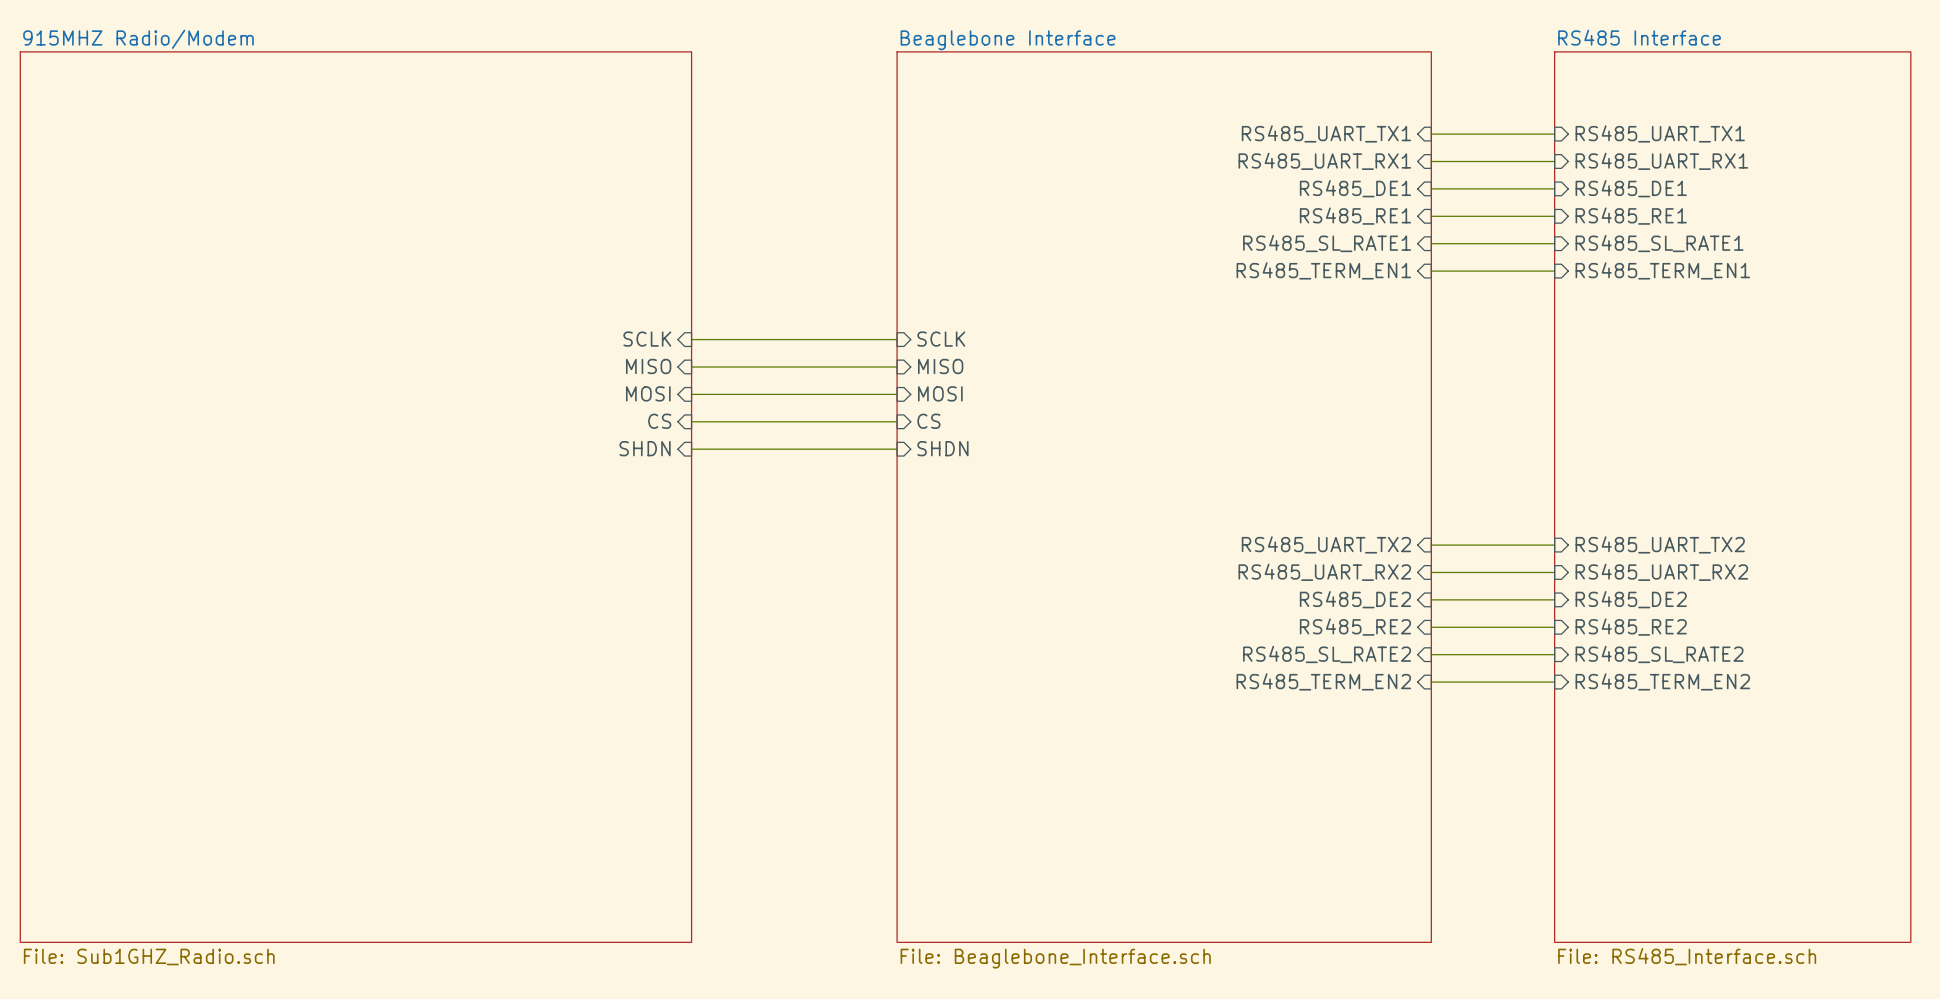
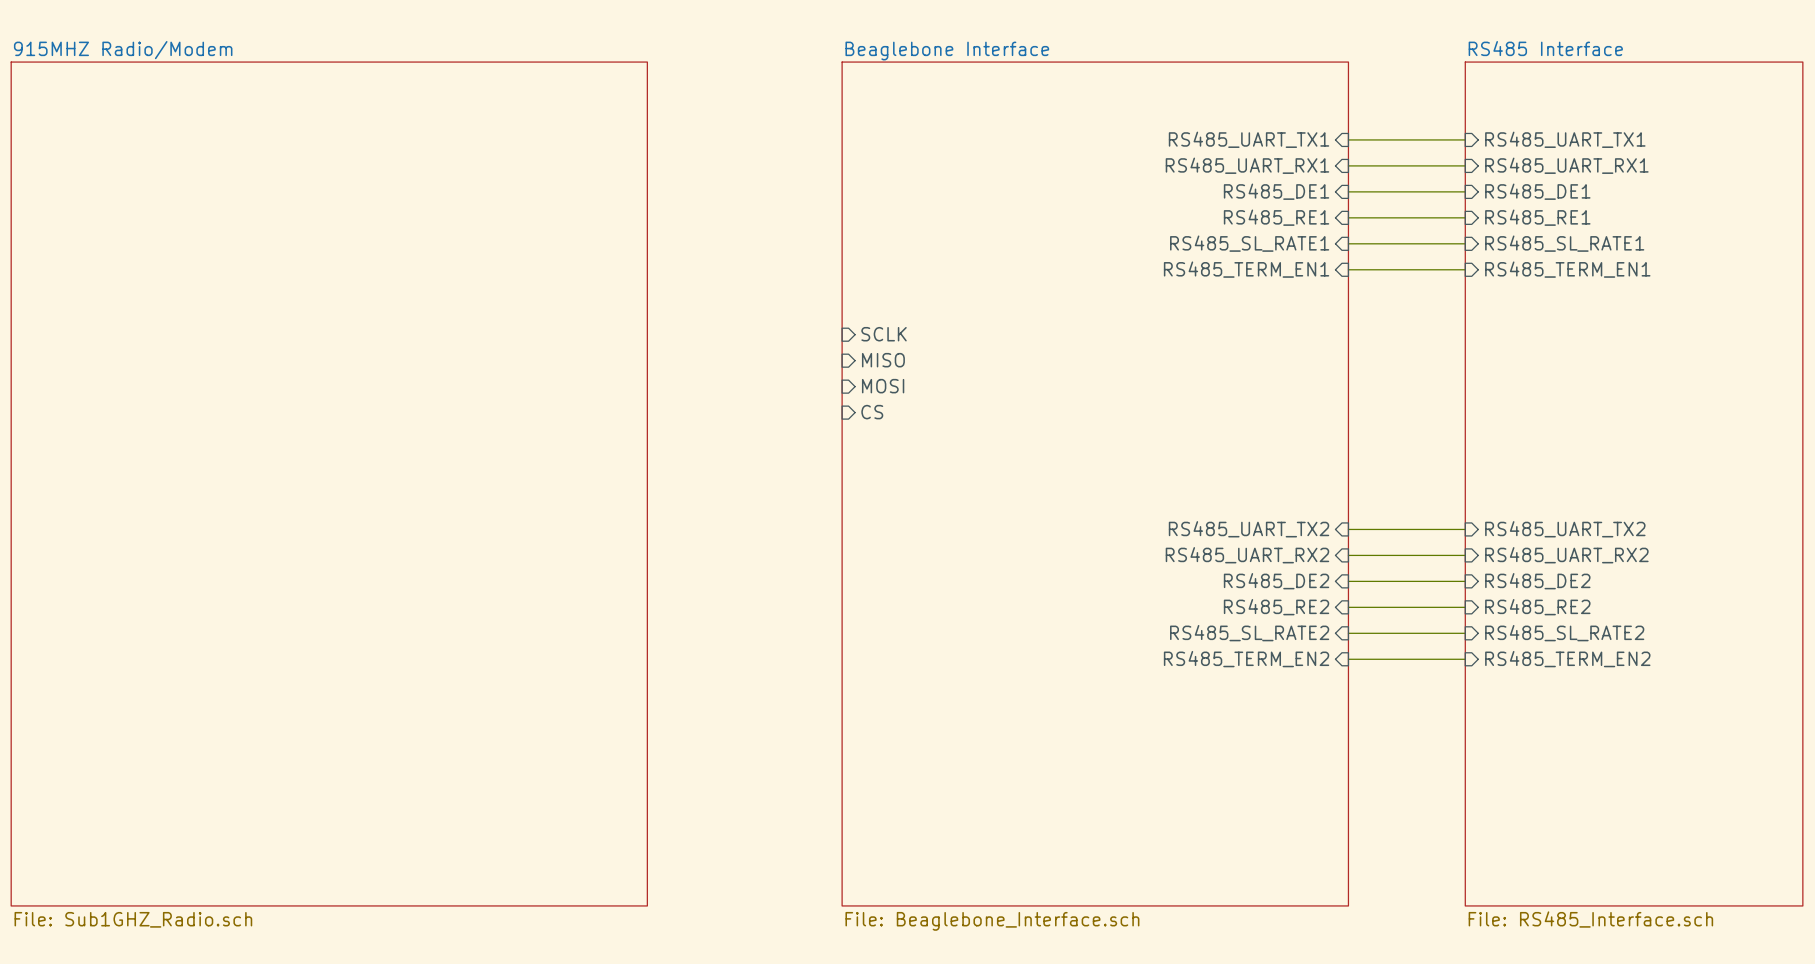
sheet pin: SCLK (647, 339) -> none
wire: (691, 339) (897, 339) -> none
sheet pin: MISO (648, 366) -> none
wire: (691, 366) (897, 366) -> none
sheet pin: MOSI (648, 393) -> none
wire: (691, 394) (897, 394) -> none
sheet pin: CS (659, 421) -> none
wire: (691, 421) (897, 421) -> none
sheet pin: SHDN (645, 448) -> none
sheet pin: SHDN (942, 448) -> none
wire: (691, 449) (897, 449) -> none

